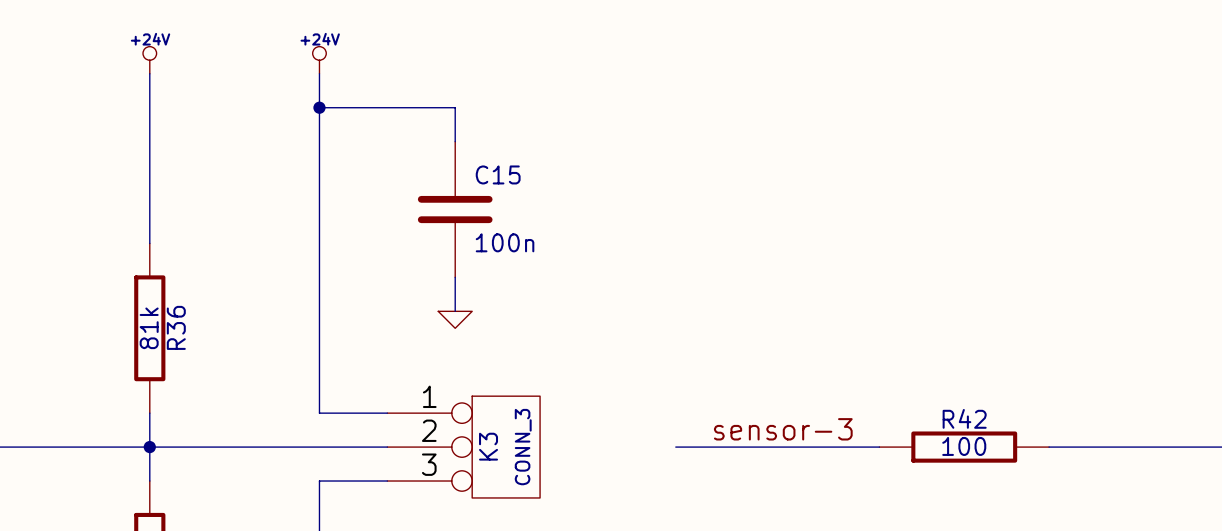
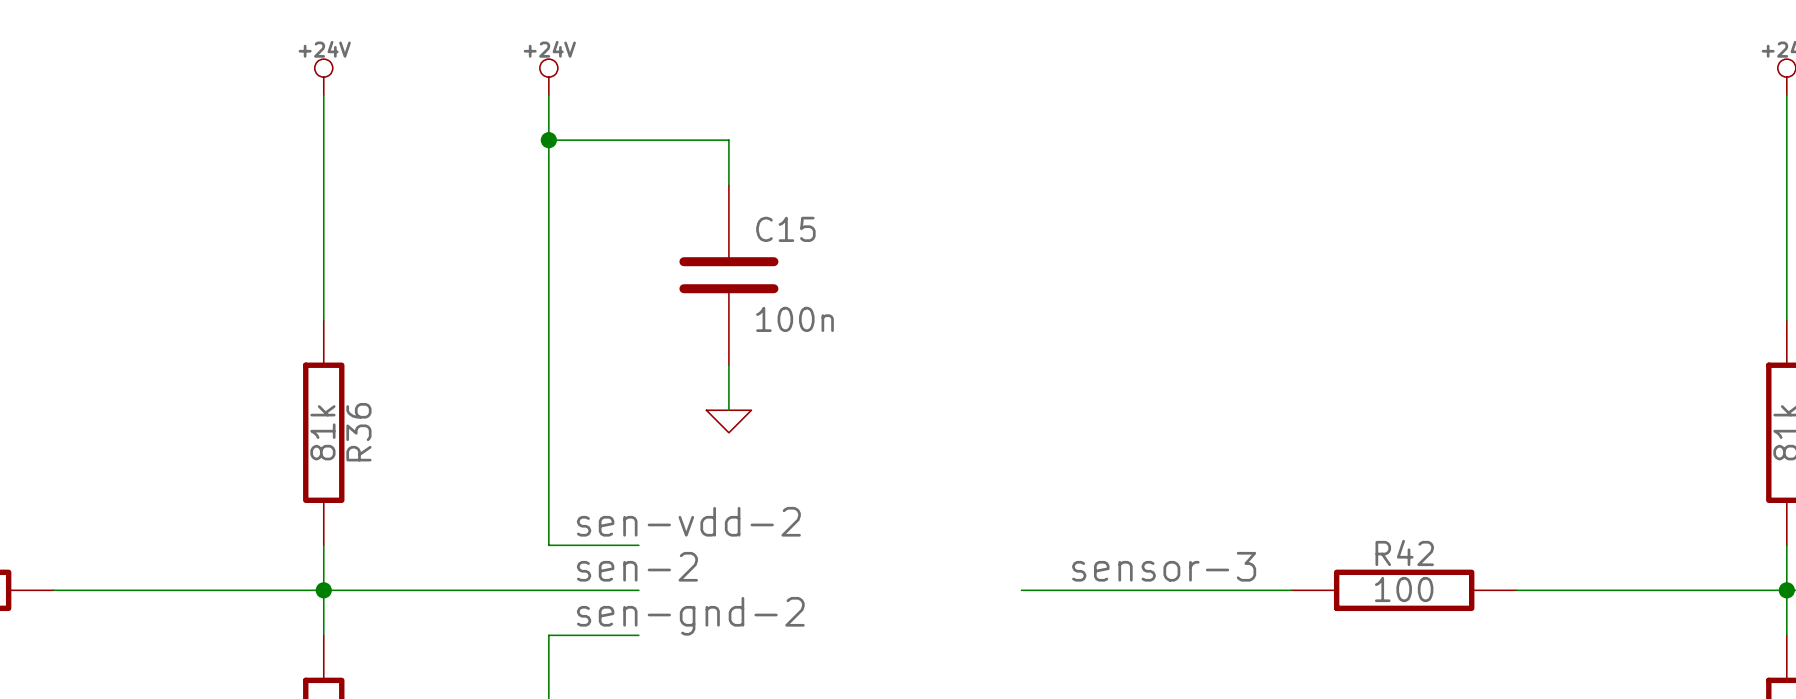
label: none -> sen-vdd-2 (688, 521)
label: none -> sen-2 (637, 566)
K3: CONN_3 (463, 447) -> none
label: none -> sen-gnd-2 (690, 616)

